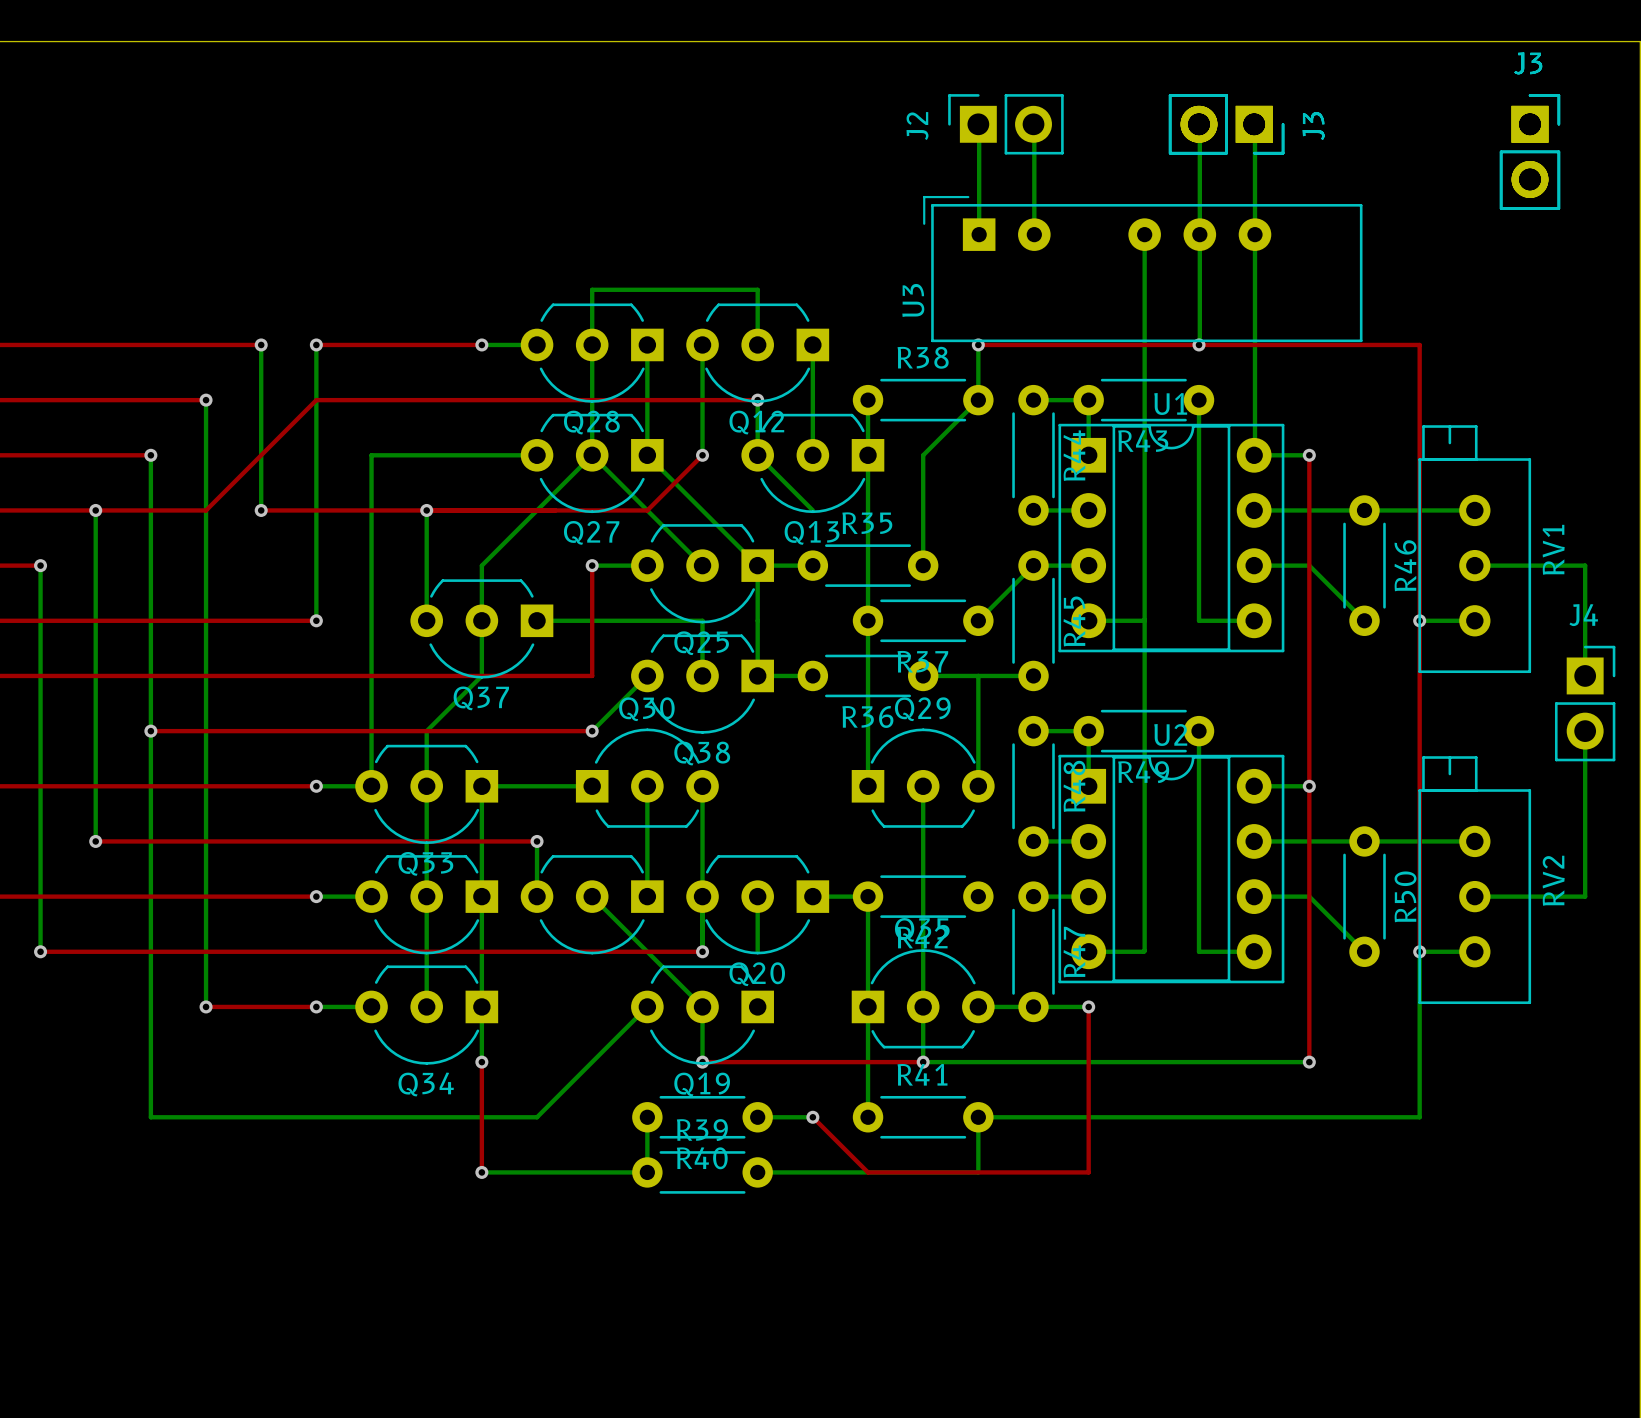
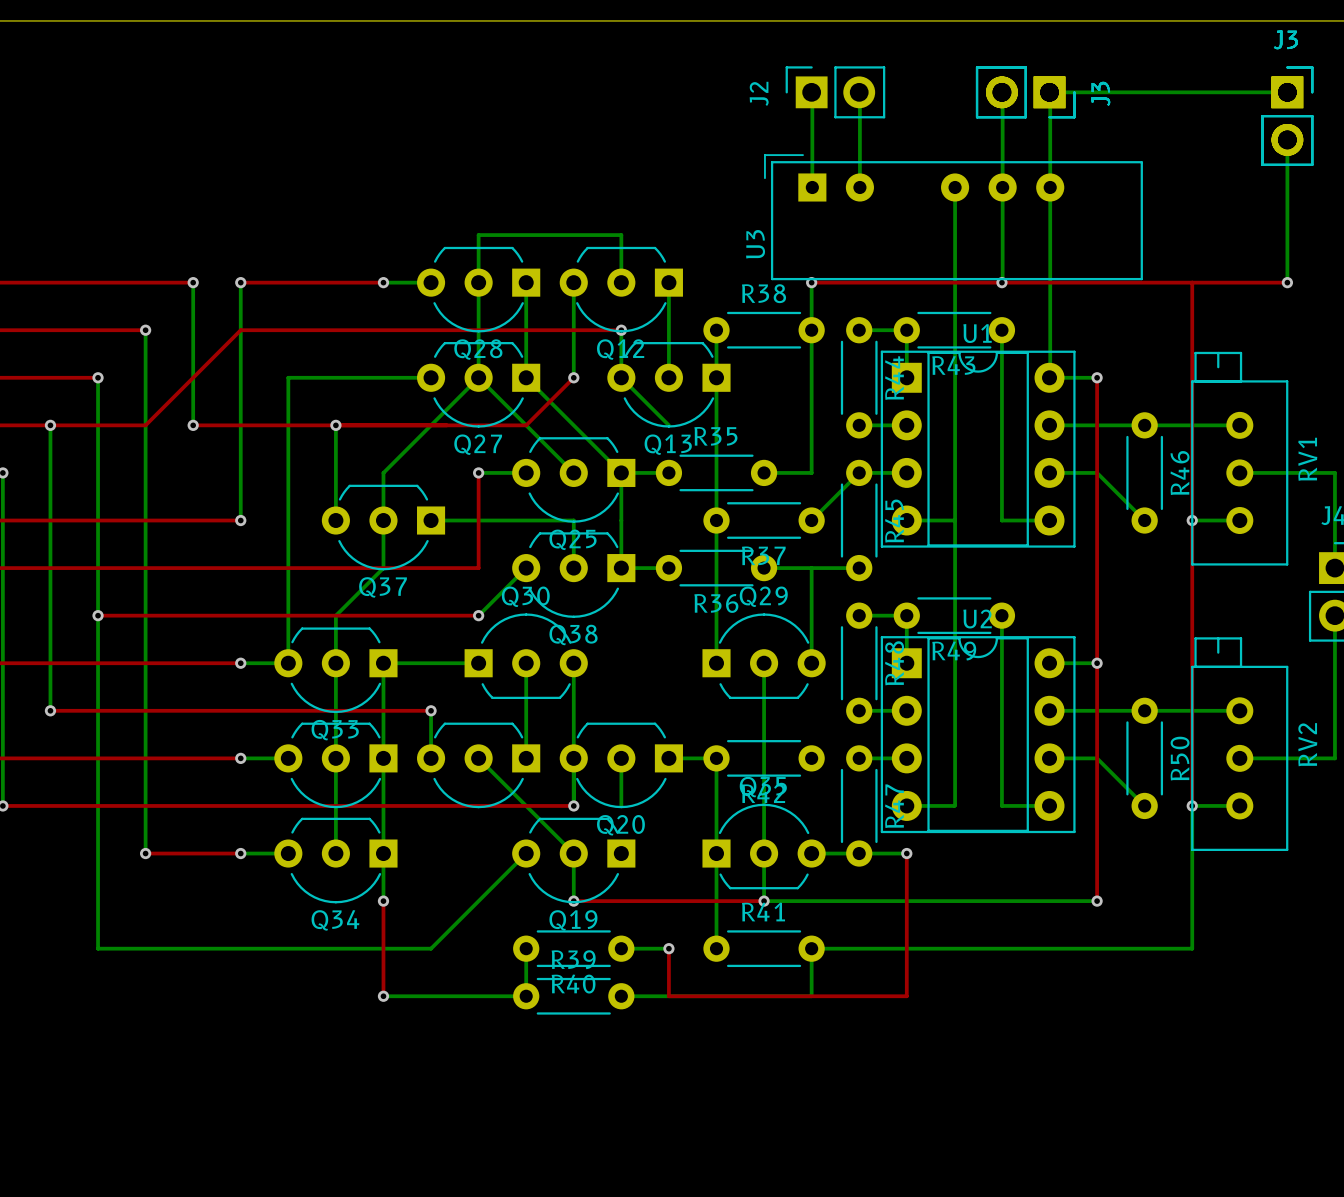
bottom track: none -> (1049, 92) (1287, 92)
bottom track: none -> (1287, 139) (1287, 282)
top track: none -> (1192, 282) (1287, 282)
via: none -> (1287, 282)
bottom track: (978, 400) (923, 455) (923, 565) -> (811, 330) (811, 472) (764, 472)
top track: (812, 1117) (868, 1172) -> (668, 948) (668, 996) (716, 996)

